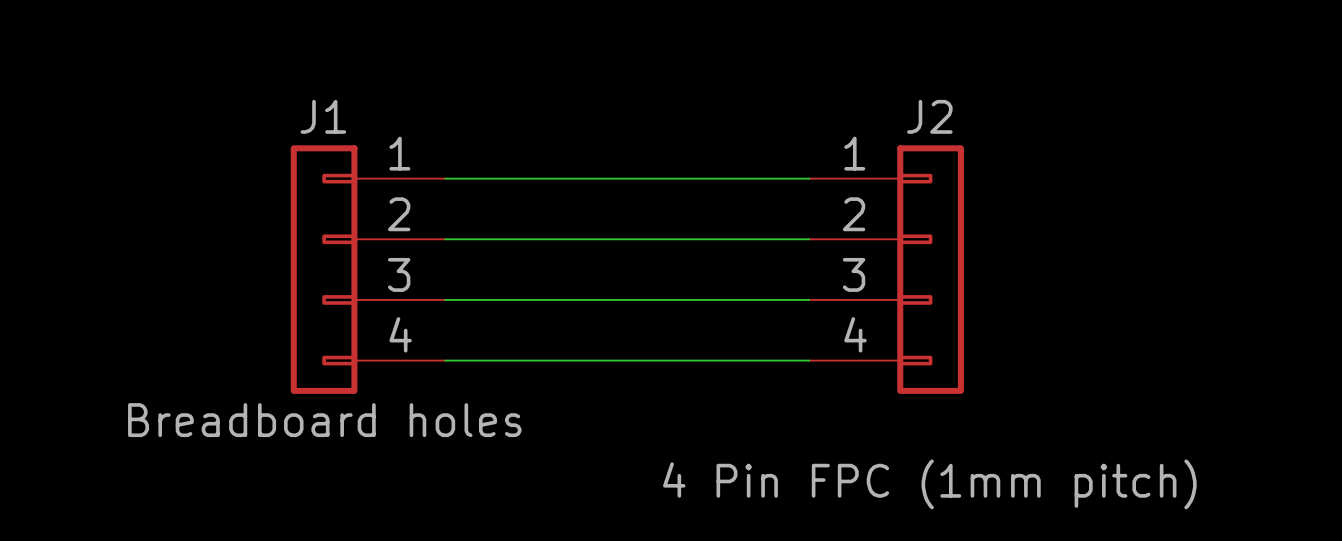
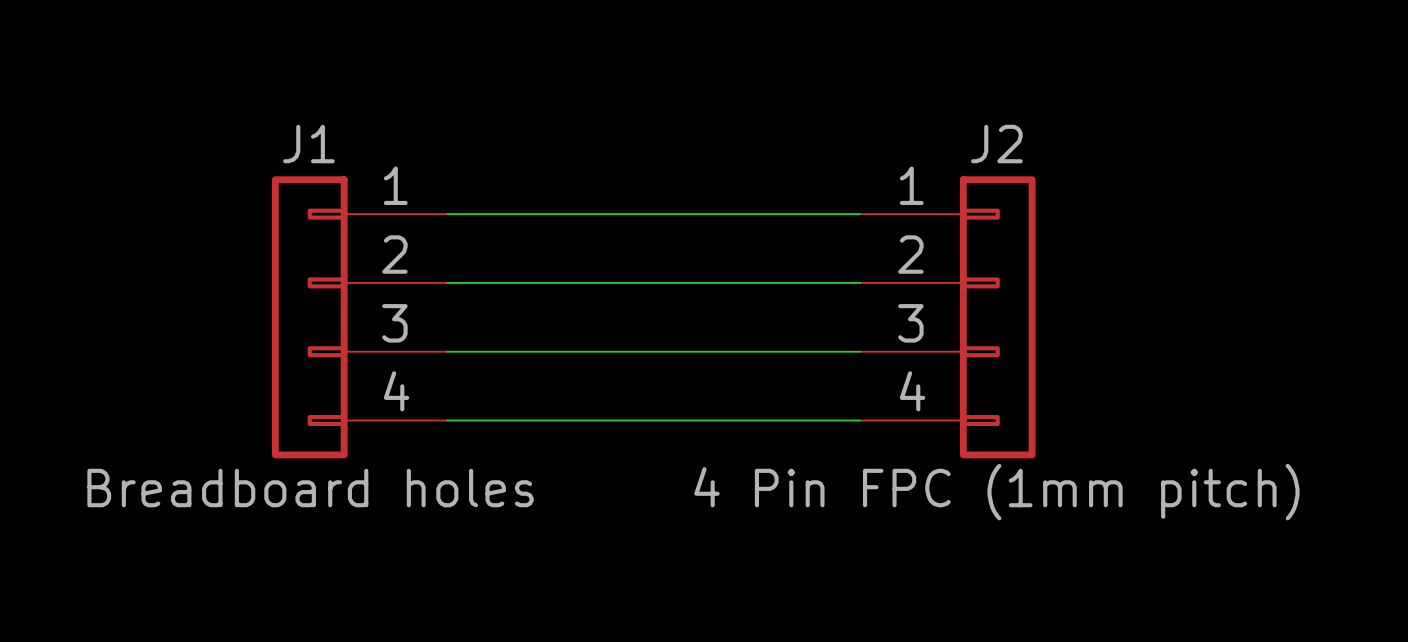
J2 value position: 4 Pin FPC (1mm pitch) (929, 484) -> 4 Pin FPC (1mm pitch) (996, 492)

